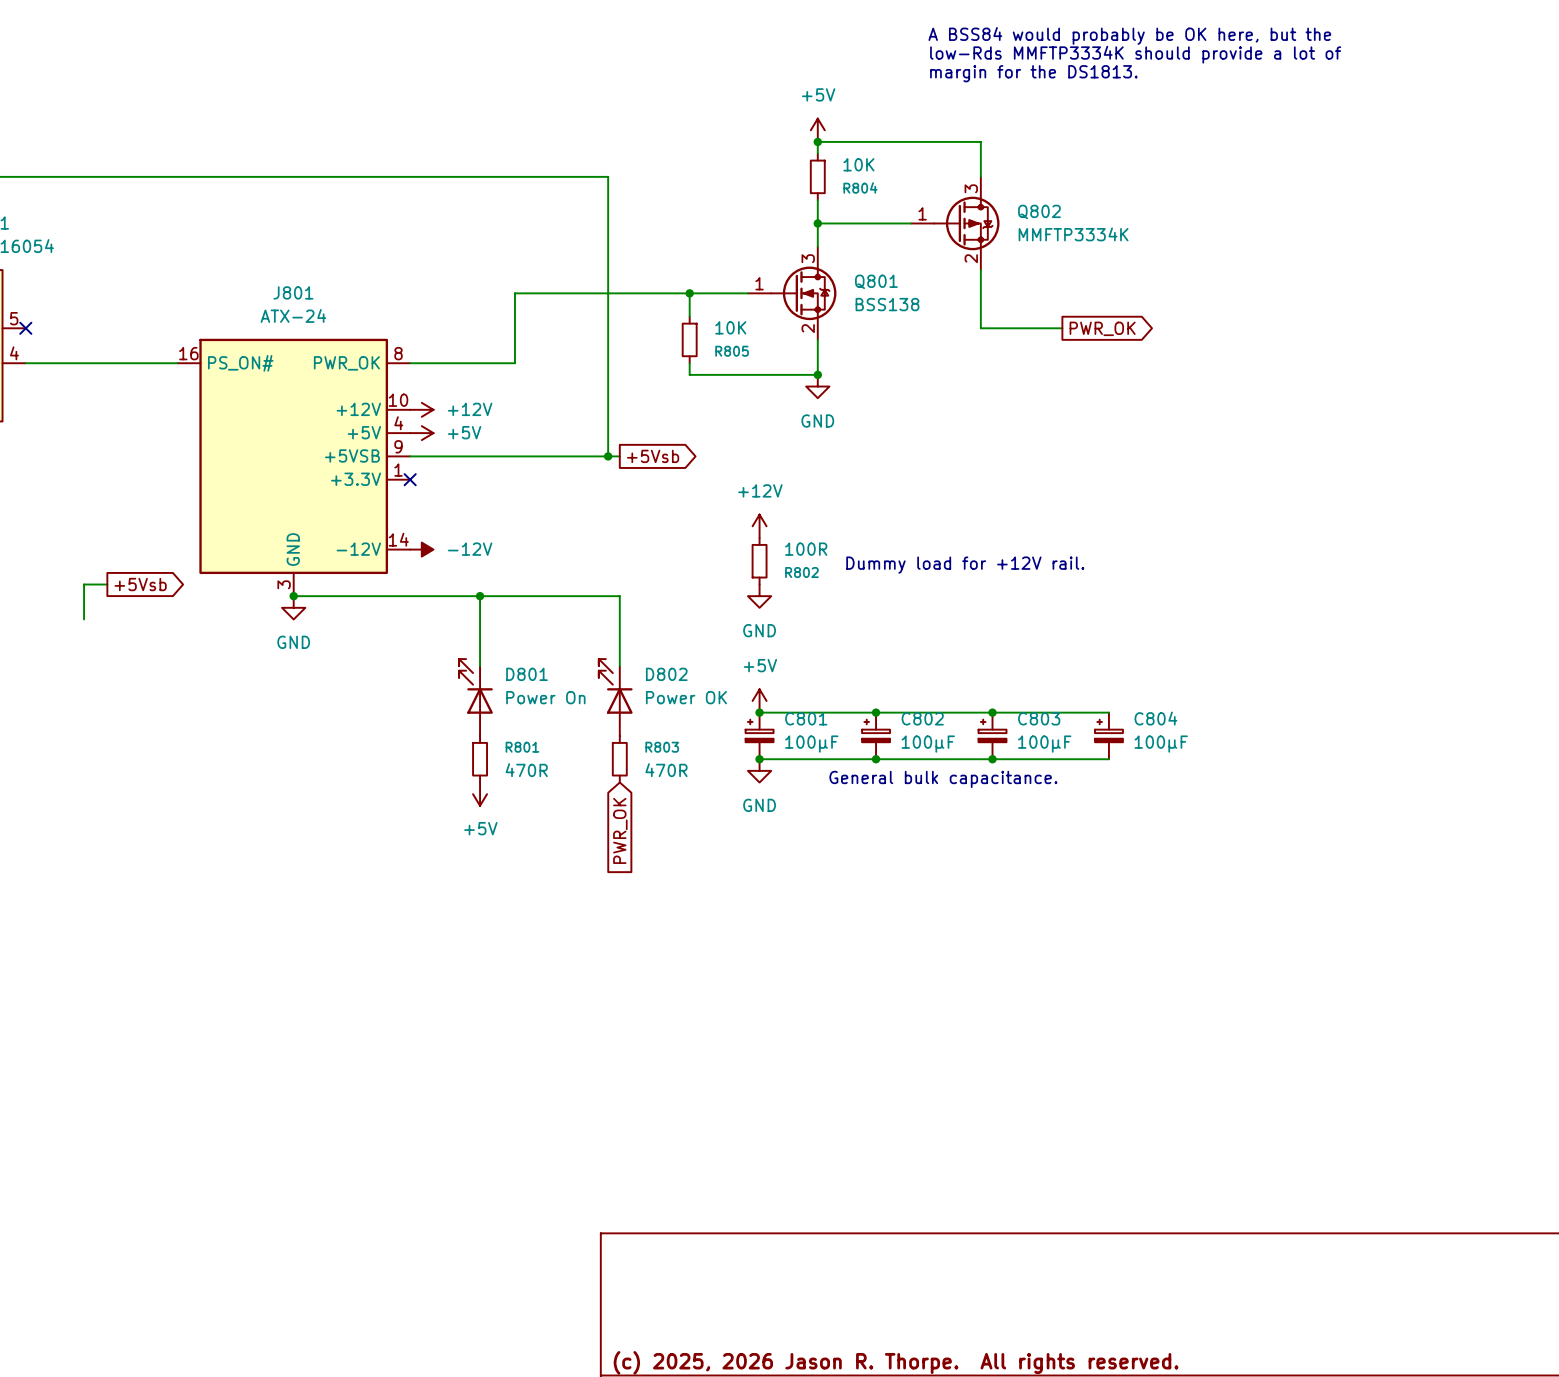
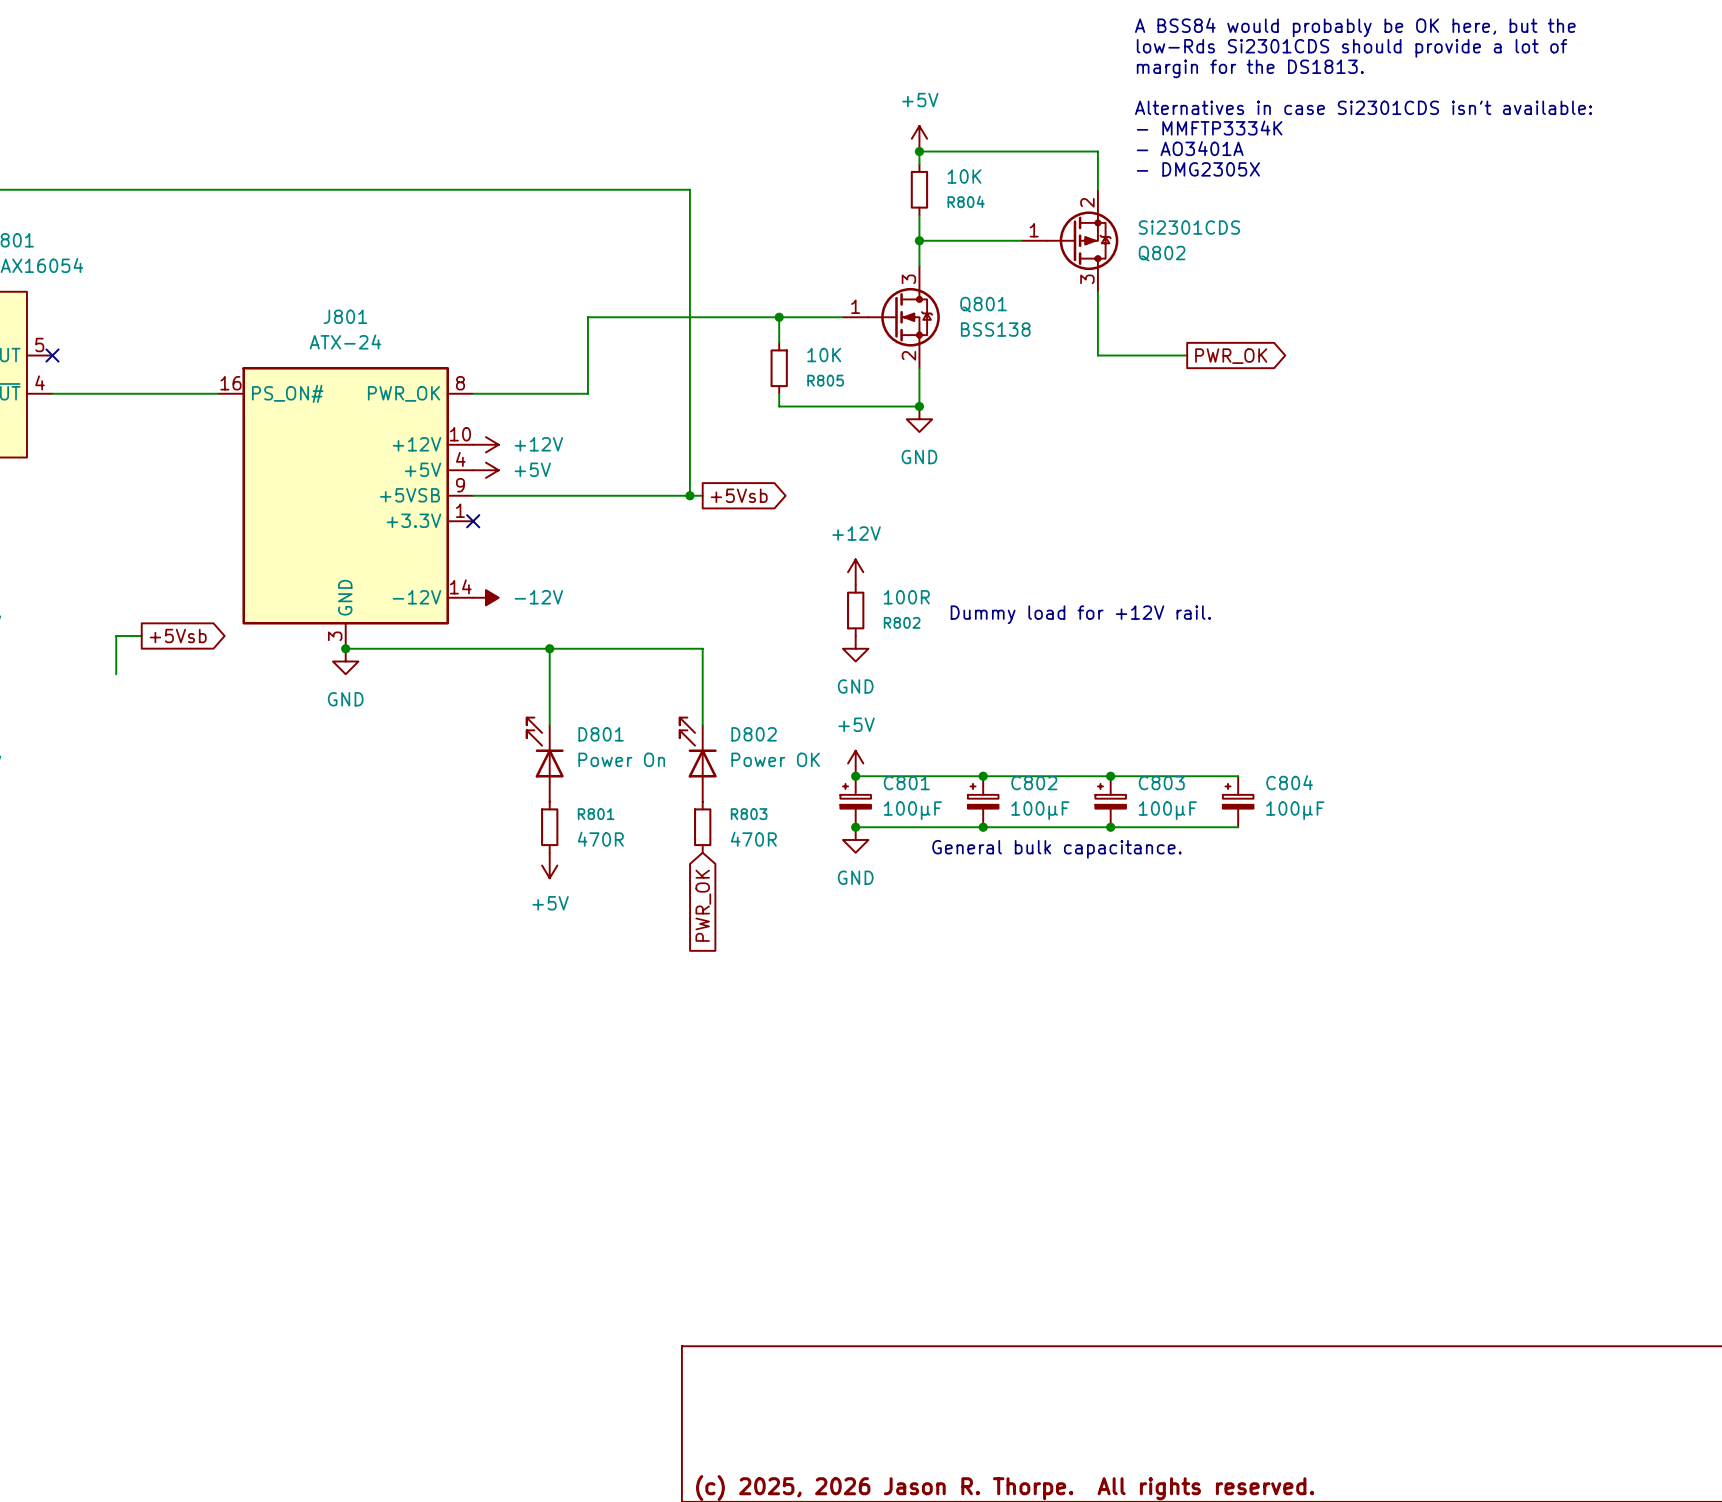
text position: A BSS84 would probably be OK here, but the (1129, 35) -> A BSS84 would probably be OK here, but the (1355, 27)
text: low-Rds MMFTP3334K should provide a lot of (1135, 54) -> low-Rds Si2301CDS should provide a lot of (1351, 48)
text position: margin for the DS1813. (1033, 73) -> margin for the DS1813. (1250, 68)
text: none -> Alternatives in case Si2301CDS isn't available: (1363, 107)
text: none -> - MMFTP3334K (1209, 128)
text: none -> - AO3401A (1190, 148)
text: none -> - DMG2305X (1198, 169)
Q802 flip: as is (966, 223) -> up-down (1082, 240)
Q802 value: MMFTP3334K (1073, 234) -> Si2301CDS (1189, 227)

